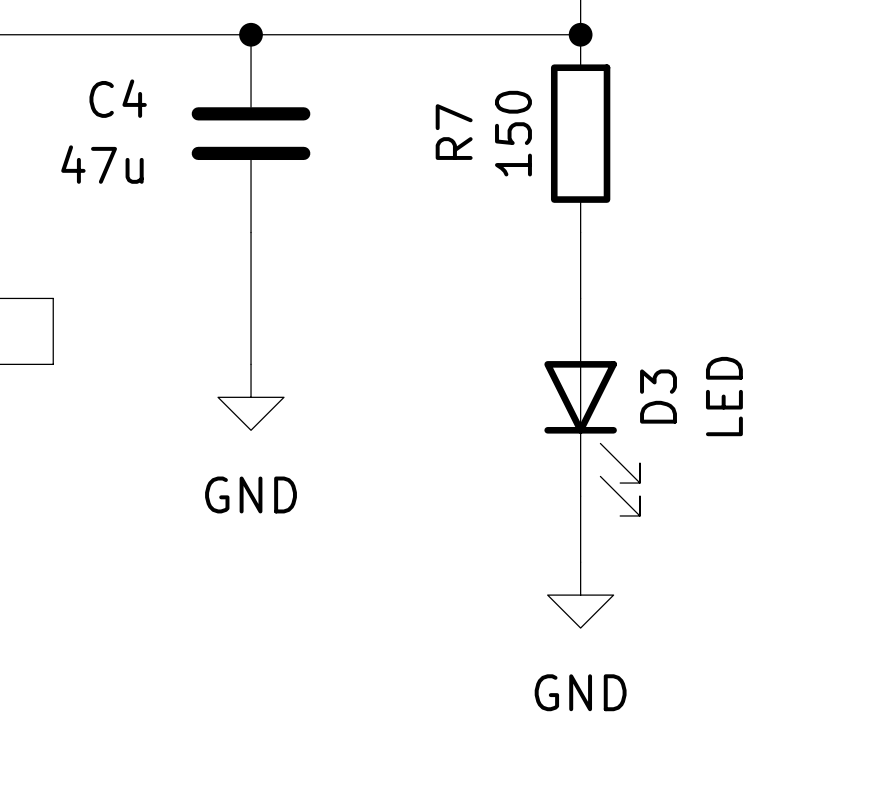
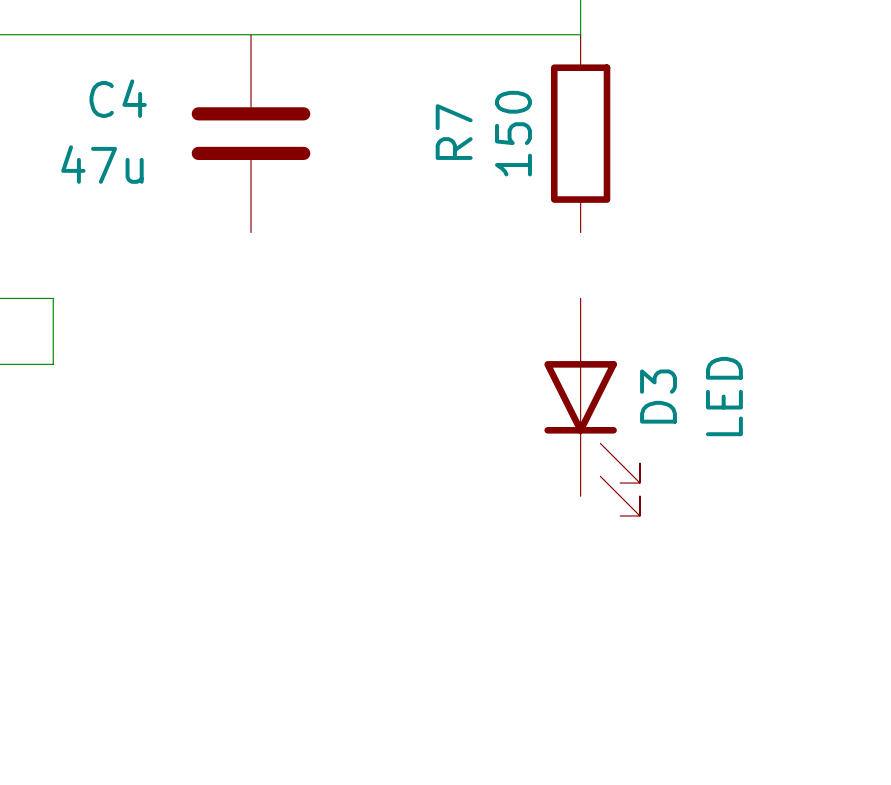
junction: (251, 34) -> none
junction: (580, 34) -> none
wire: (251, 232) (251, 364) -> none
wire: (580, 232) (580, 298) -> none
power symbol: GND (251, 397) -> none
wire: (580, 496) (580, 562) -> none
power symbol: GND (580, 595) -> none

